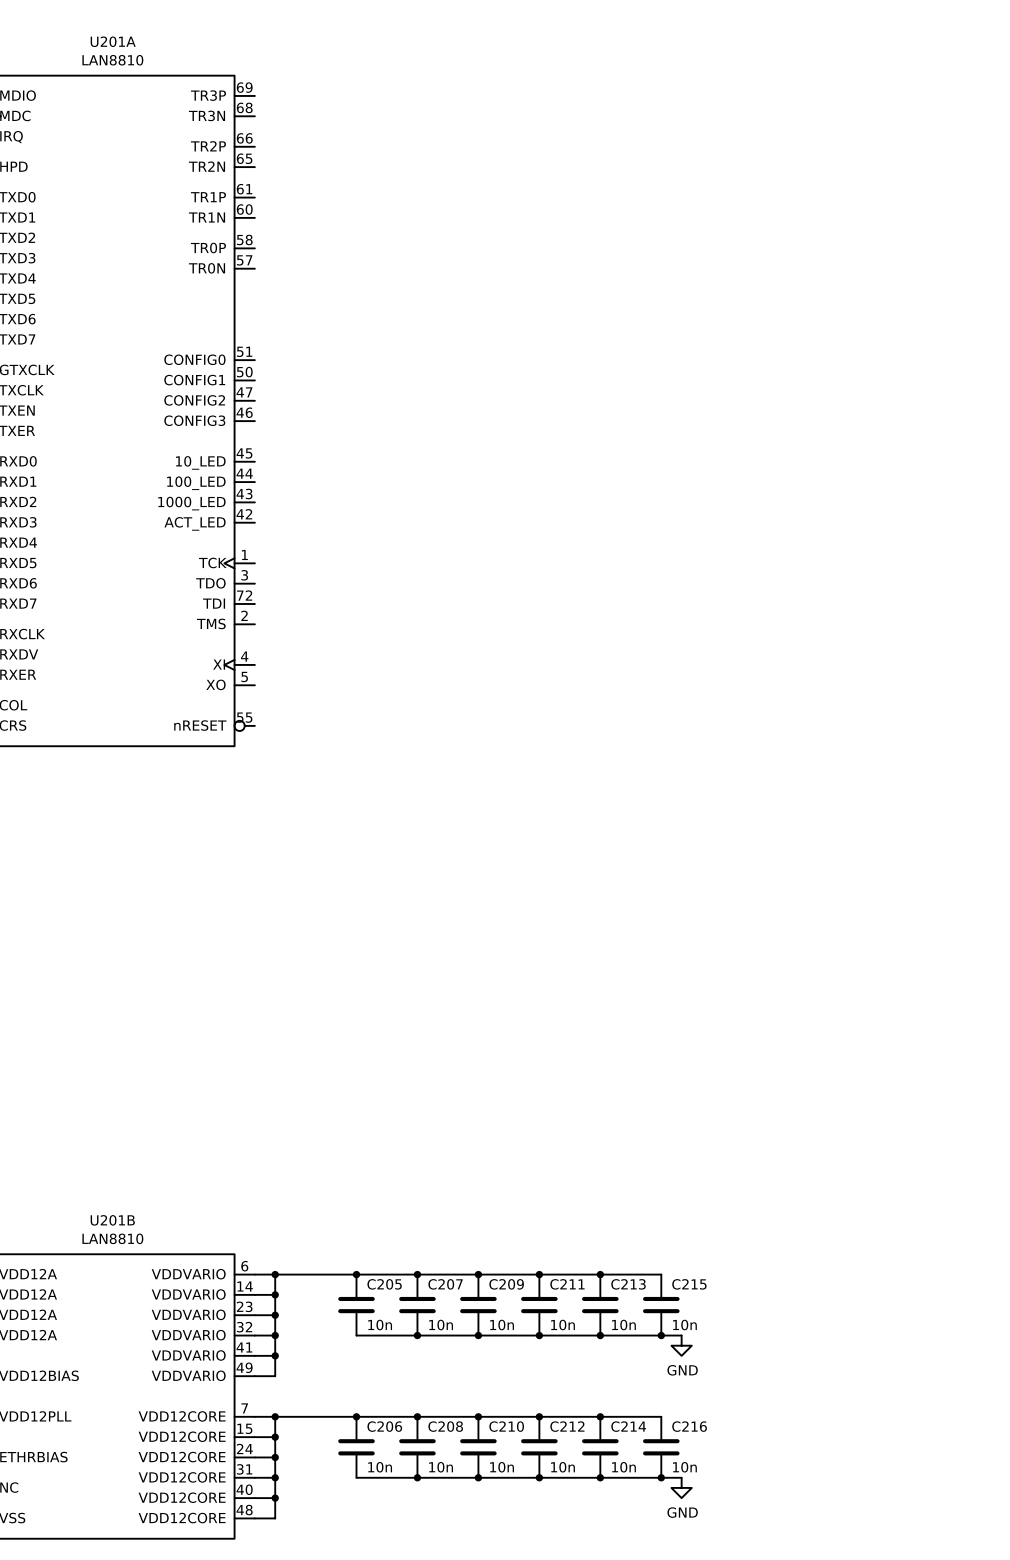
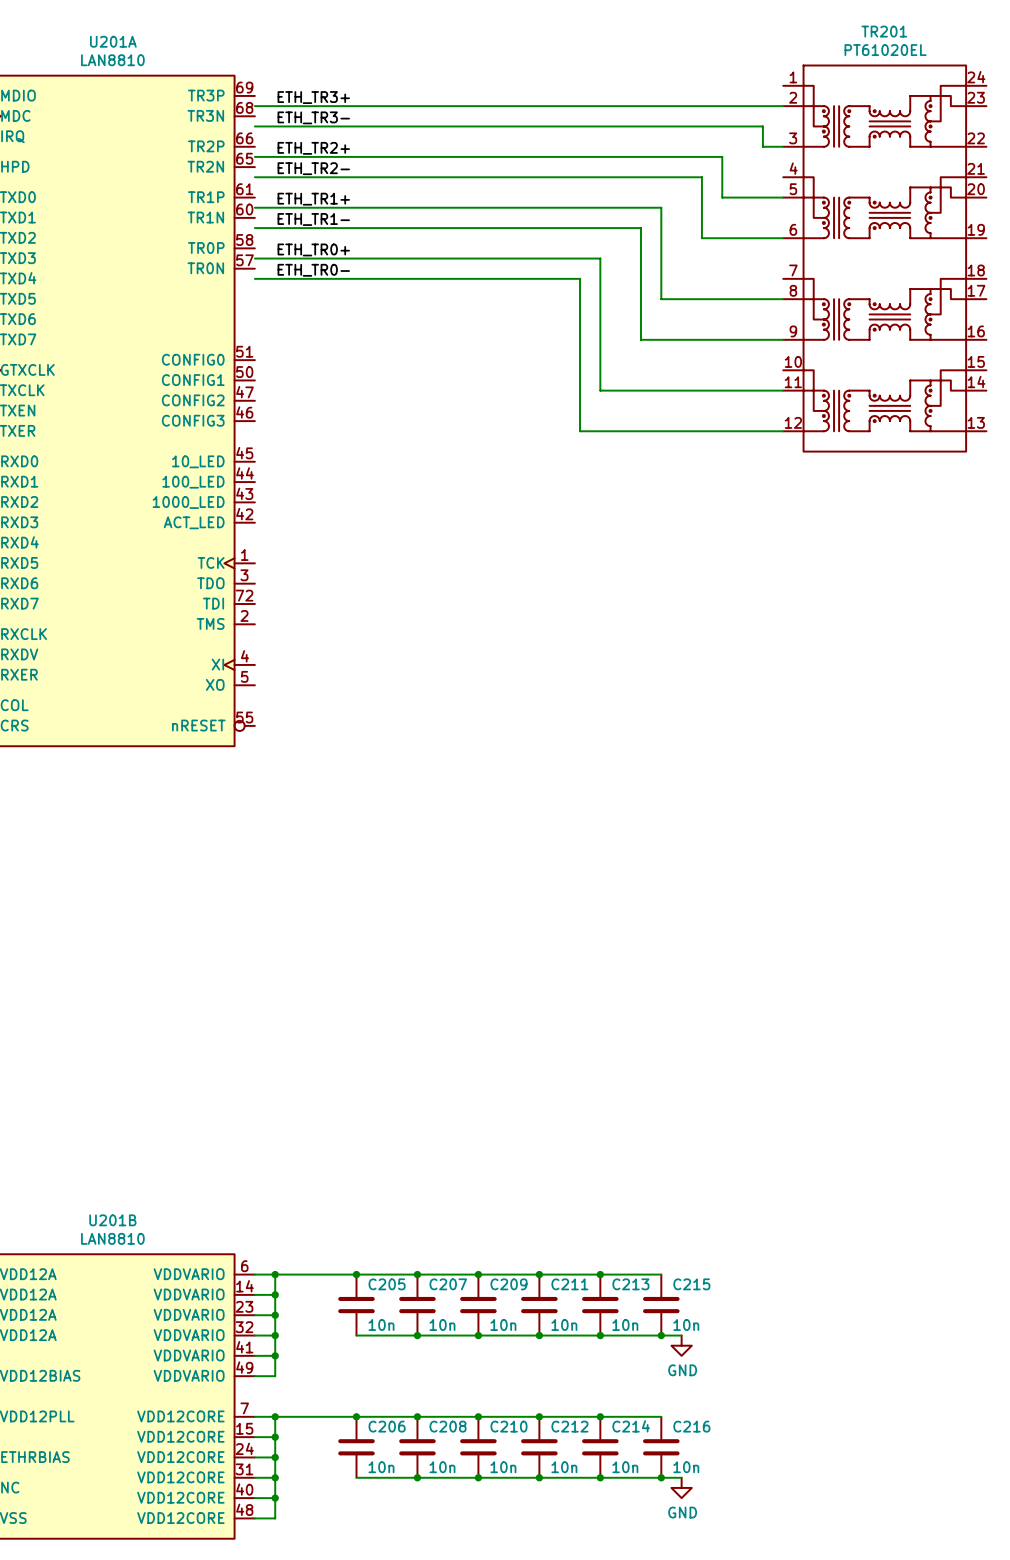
label: none -> ETH_TR3+ (313, 97)
wire: none -> (254, 106) (783, 106)
label: none -> ETH_TR3- (313, 117)
wire: none -> (254, 126) (762, 126) (762, 146) (783, 146)
label: none -> ETH_TR2+ (313, 148)
wire: none -> (254, 156) (722, 156) (722, 197) (783, 197)
label: none -> ETH_TR2- (313, 168)
wire: none -> (254, 177) (701, 177) (701, 238) (783, 238)
label: none -> ETH_TR1+ (313, 199)
wire: none -> (254, 207) (661, 207) (661, 299) (783, 299)
label: none -> ETH_TR1- (313, 219)
wire: none -> (254, 228) (640, 228) (640, 339) (783, 339)
label: none -> ETH_TR0+ (313, 249)
wire: none -> (254, 258) (600, 258) (600, 390) (783, 390)
TR201: none -> PT61020EL (884, 258)
label: none -> ETH_TR0- (313, 270)
wire: none -> (254, 278) (580, 278) (580, 431) (783, 431)

